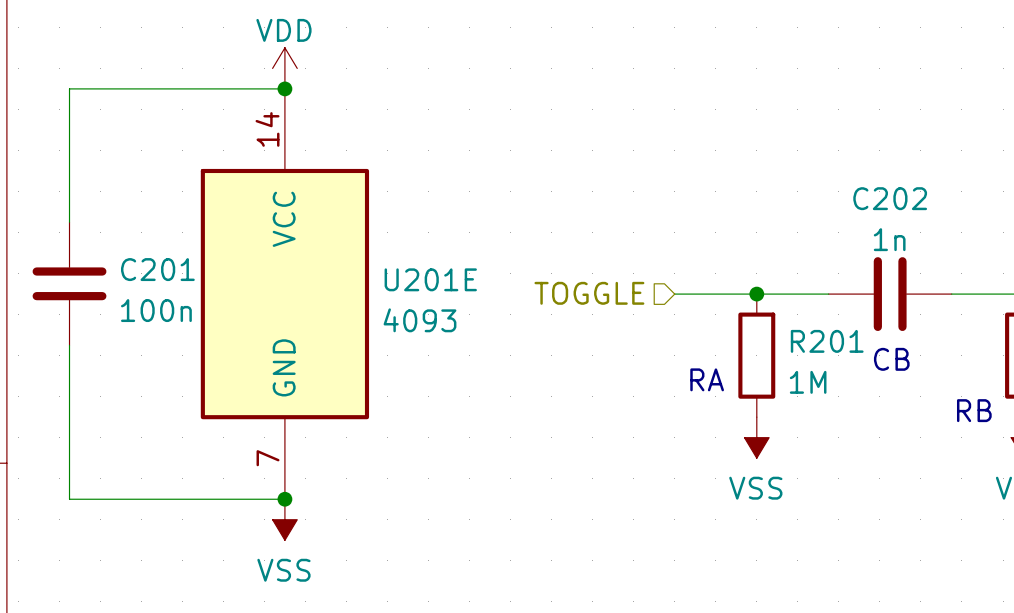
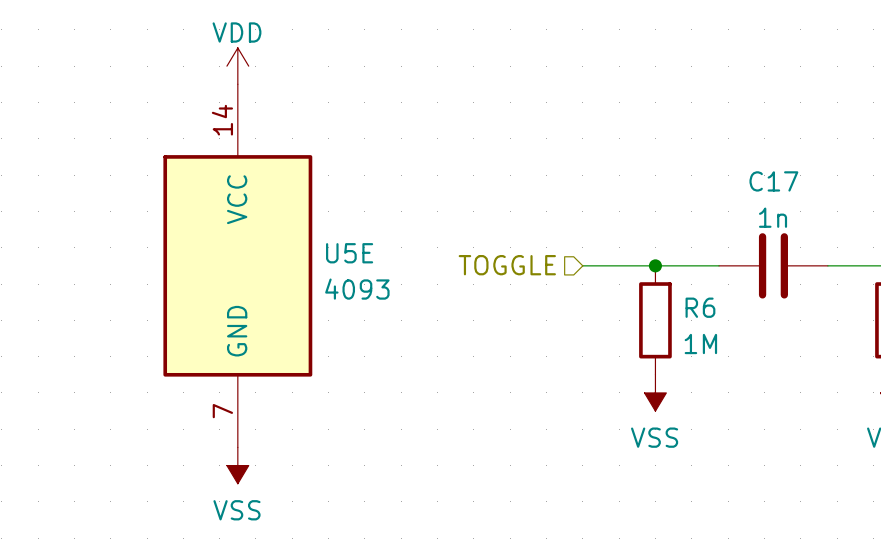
wire: (284, 88) (69, 88) (69, 222) -> none
junction: (284, 88) -> none
C202 name: C202 (890, 198) -> C17 (773, 181)
U201E name: U201E (430, 279) -> U5E (349, 253)
C201: 100n (69, 283) -> none
R201 name: R201 (827, 341) -> R6 (700, 307)
wire: (69, 345) (69, 499) (284, 499) -> none
text: CB (891, 359) -> none
text: RA (707, 379) -> none
text: RB (974, 410) -> none
junction: (284, 499) -> none

